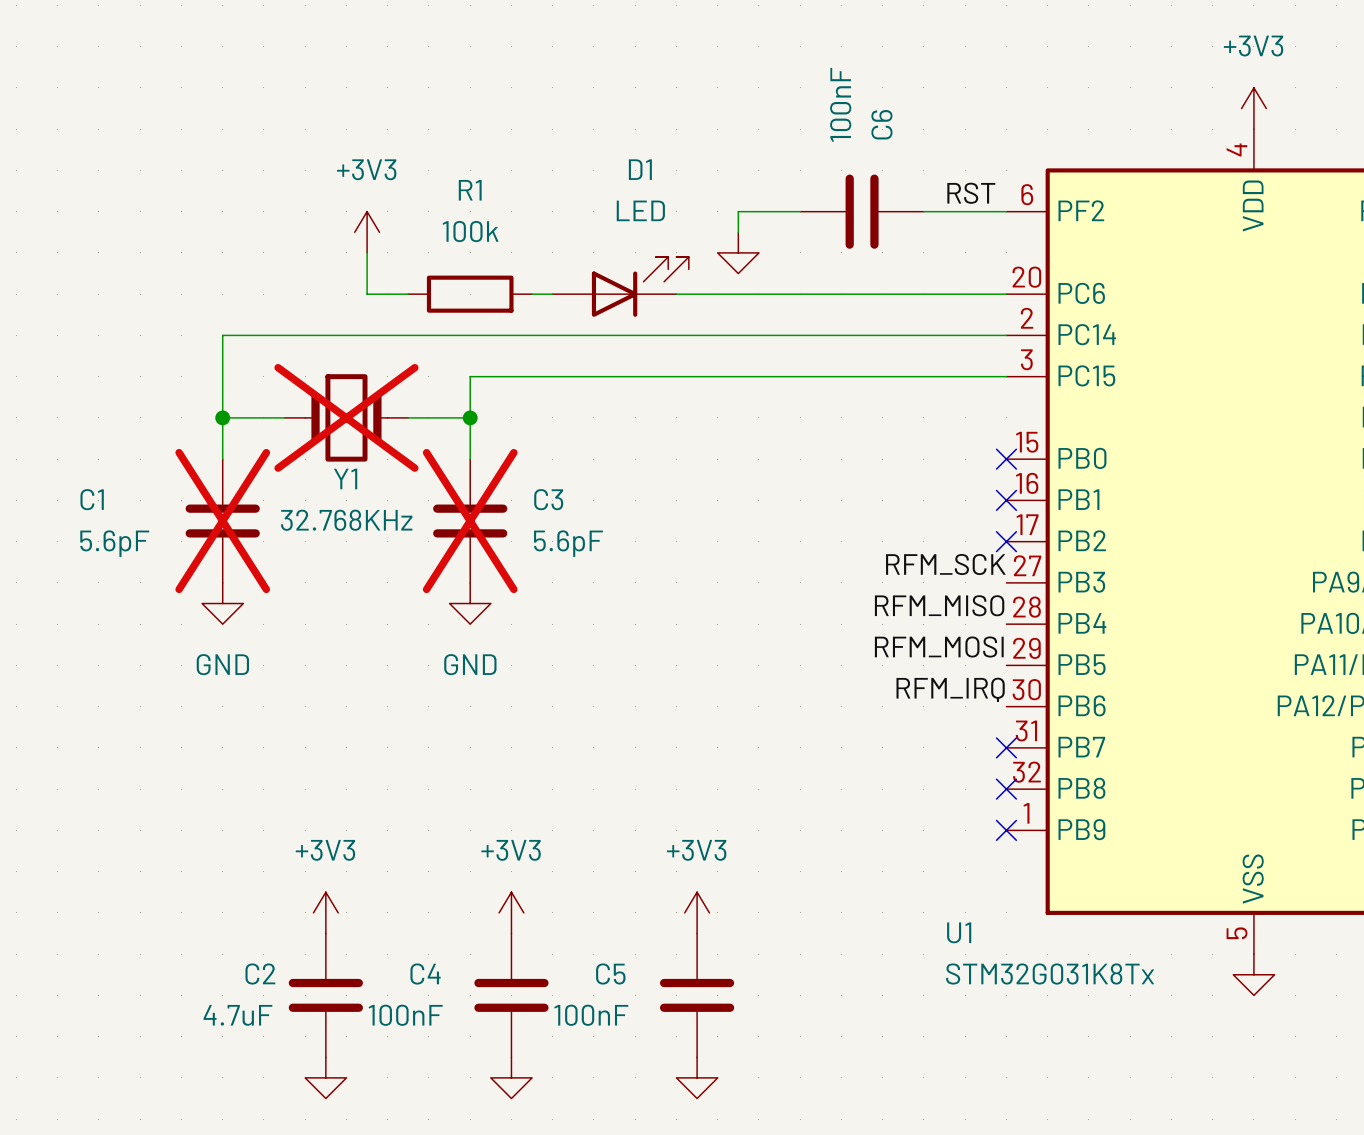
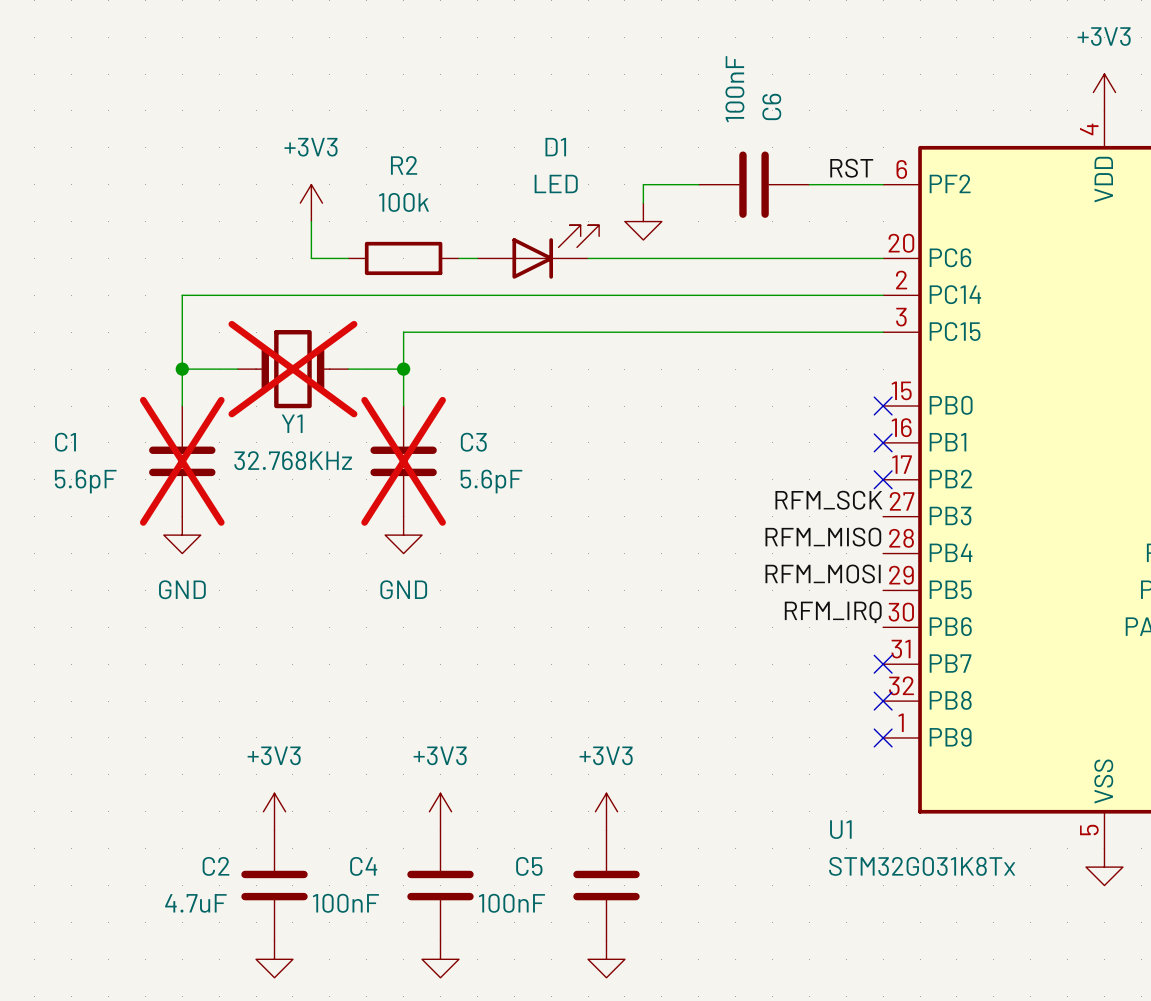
R1 name: R1 (470, 190) -> R2 (404, 165)

